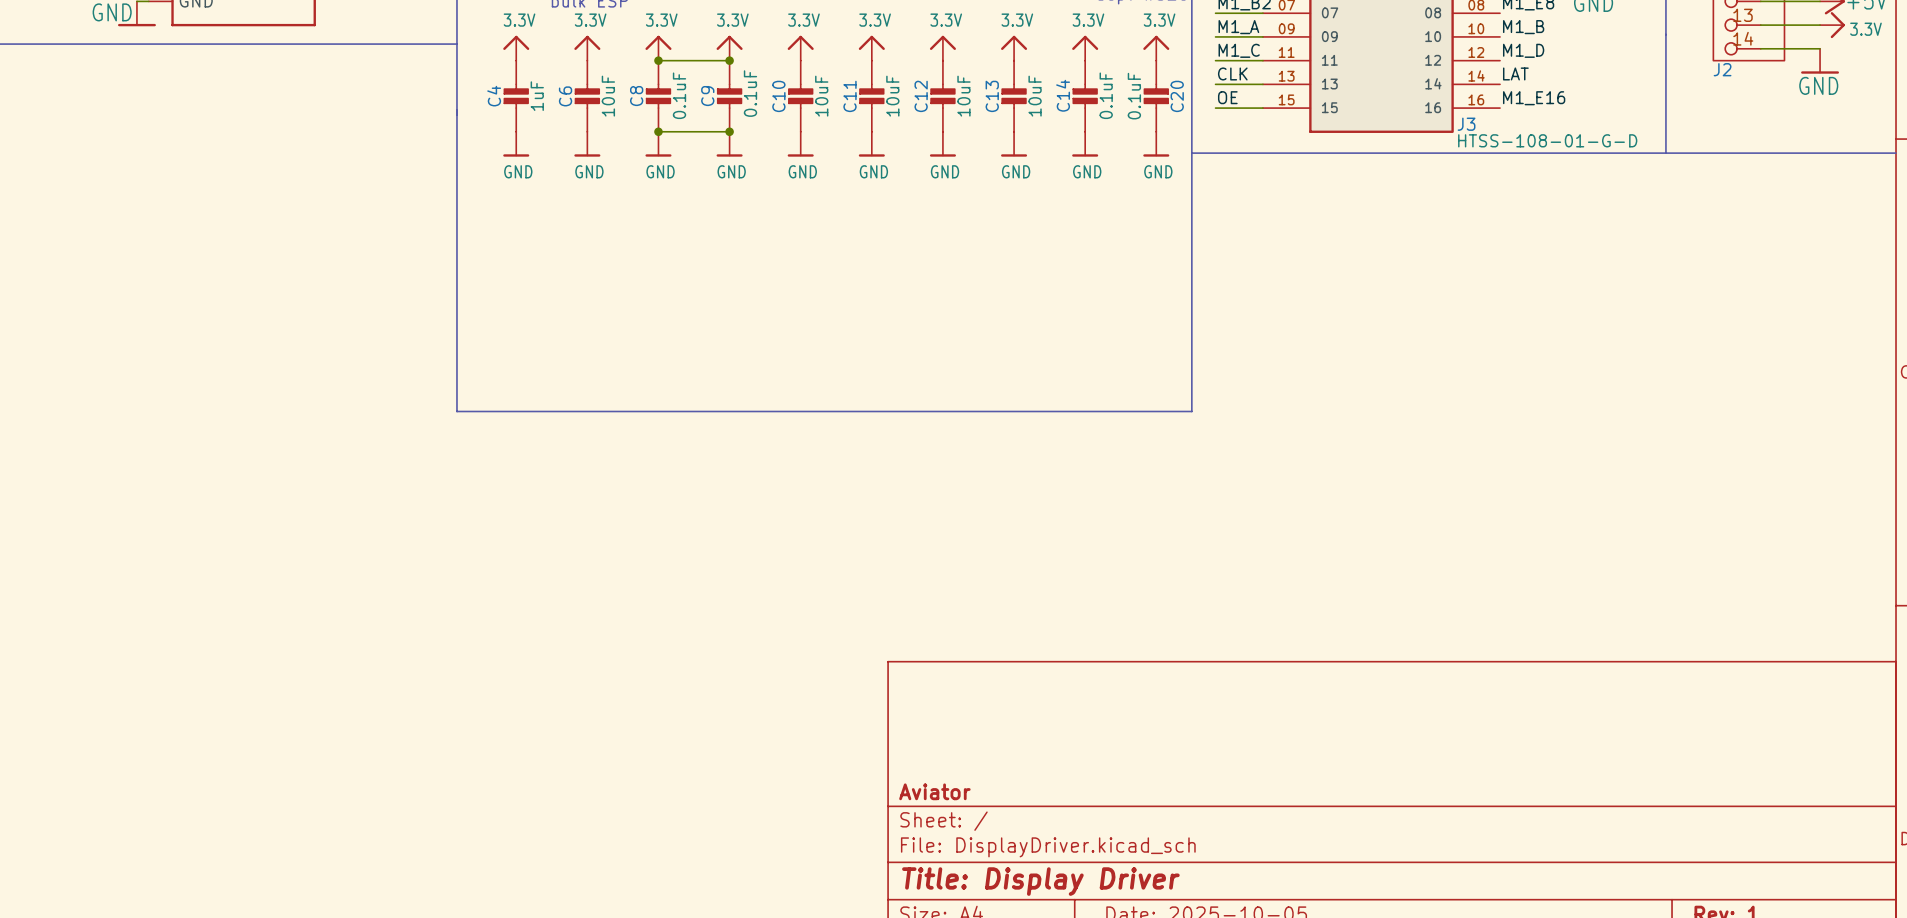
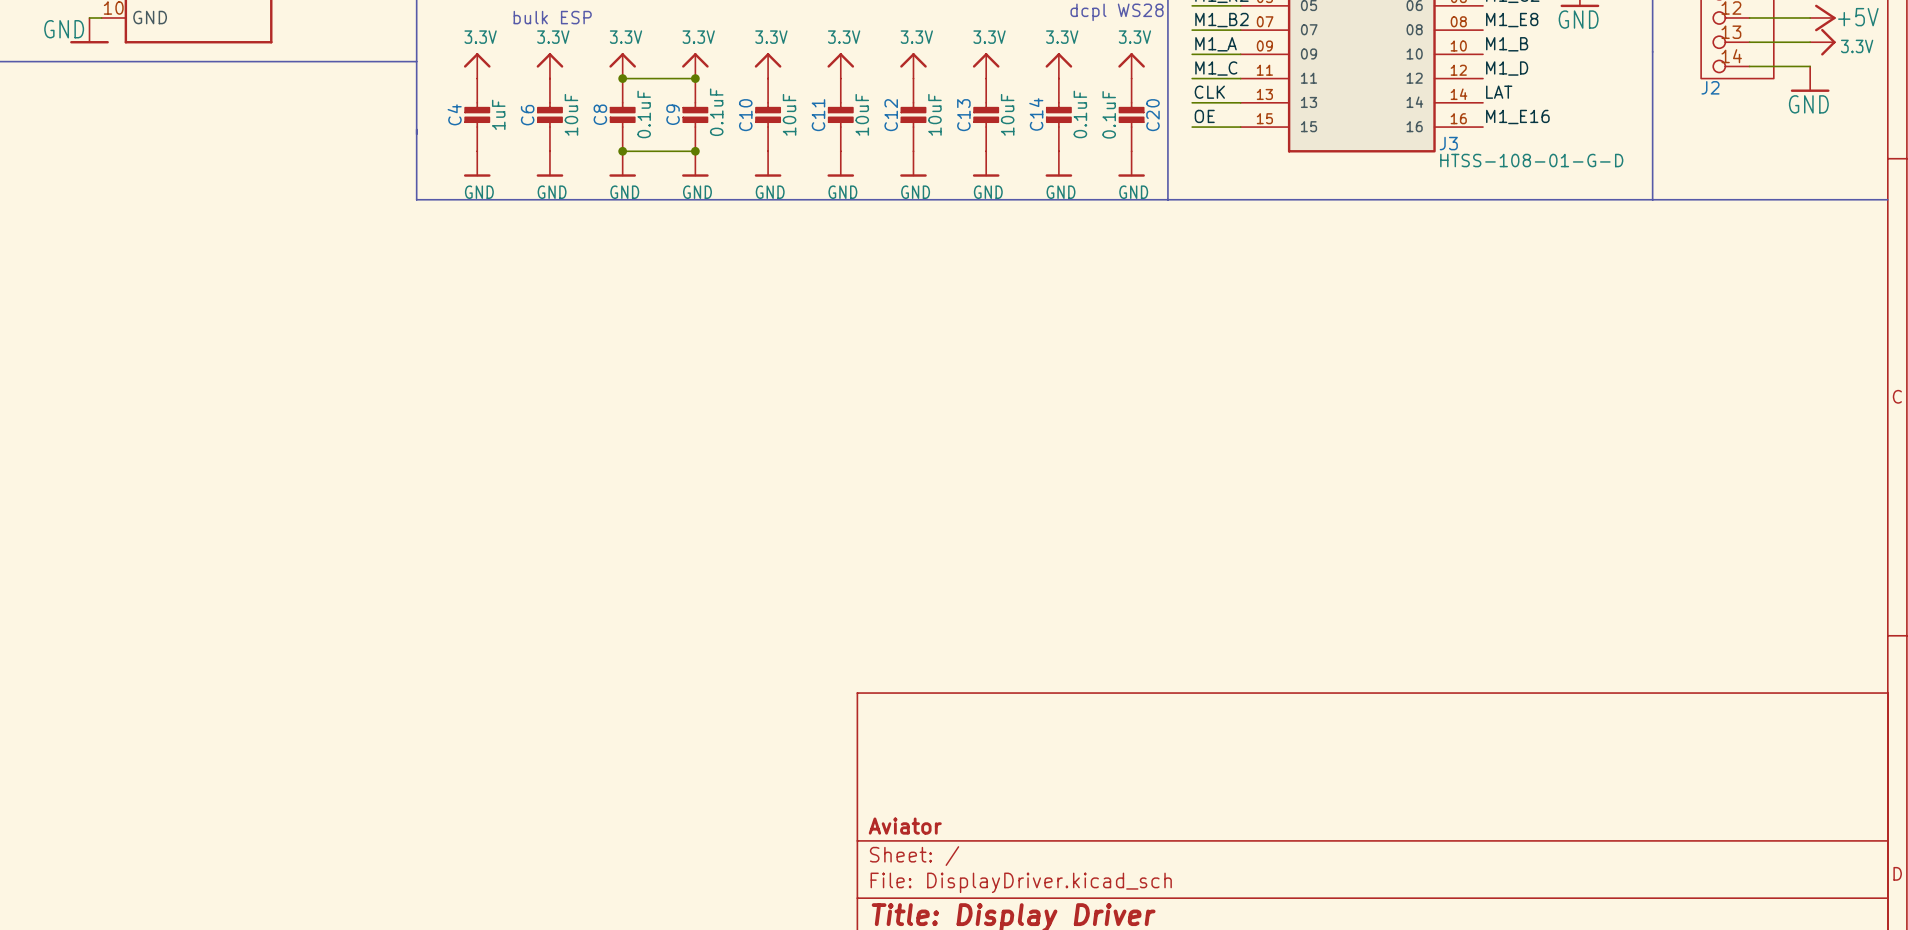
line: (1191, 153) (1895, 153) -> none
line: none -> (1652, 173) (1652, 199)
line: (456, 179) (456, 411) (1191, 411) (1191, 179) -> (416, 199) (1887, 199)

